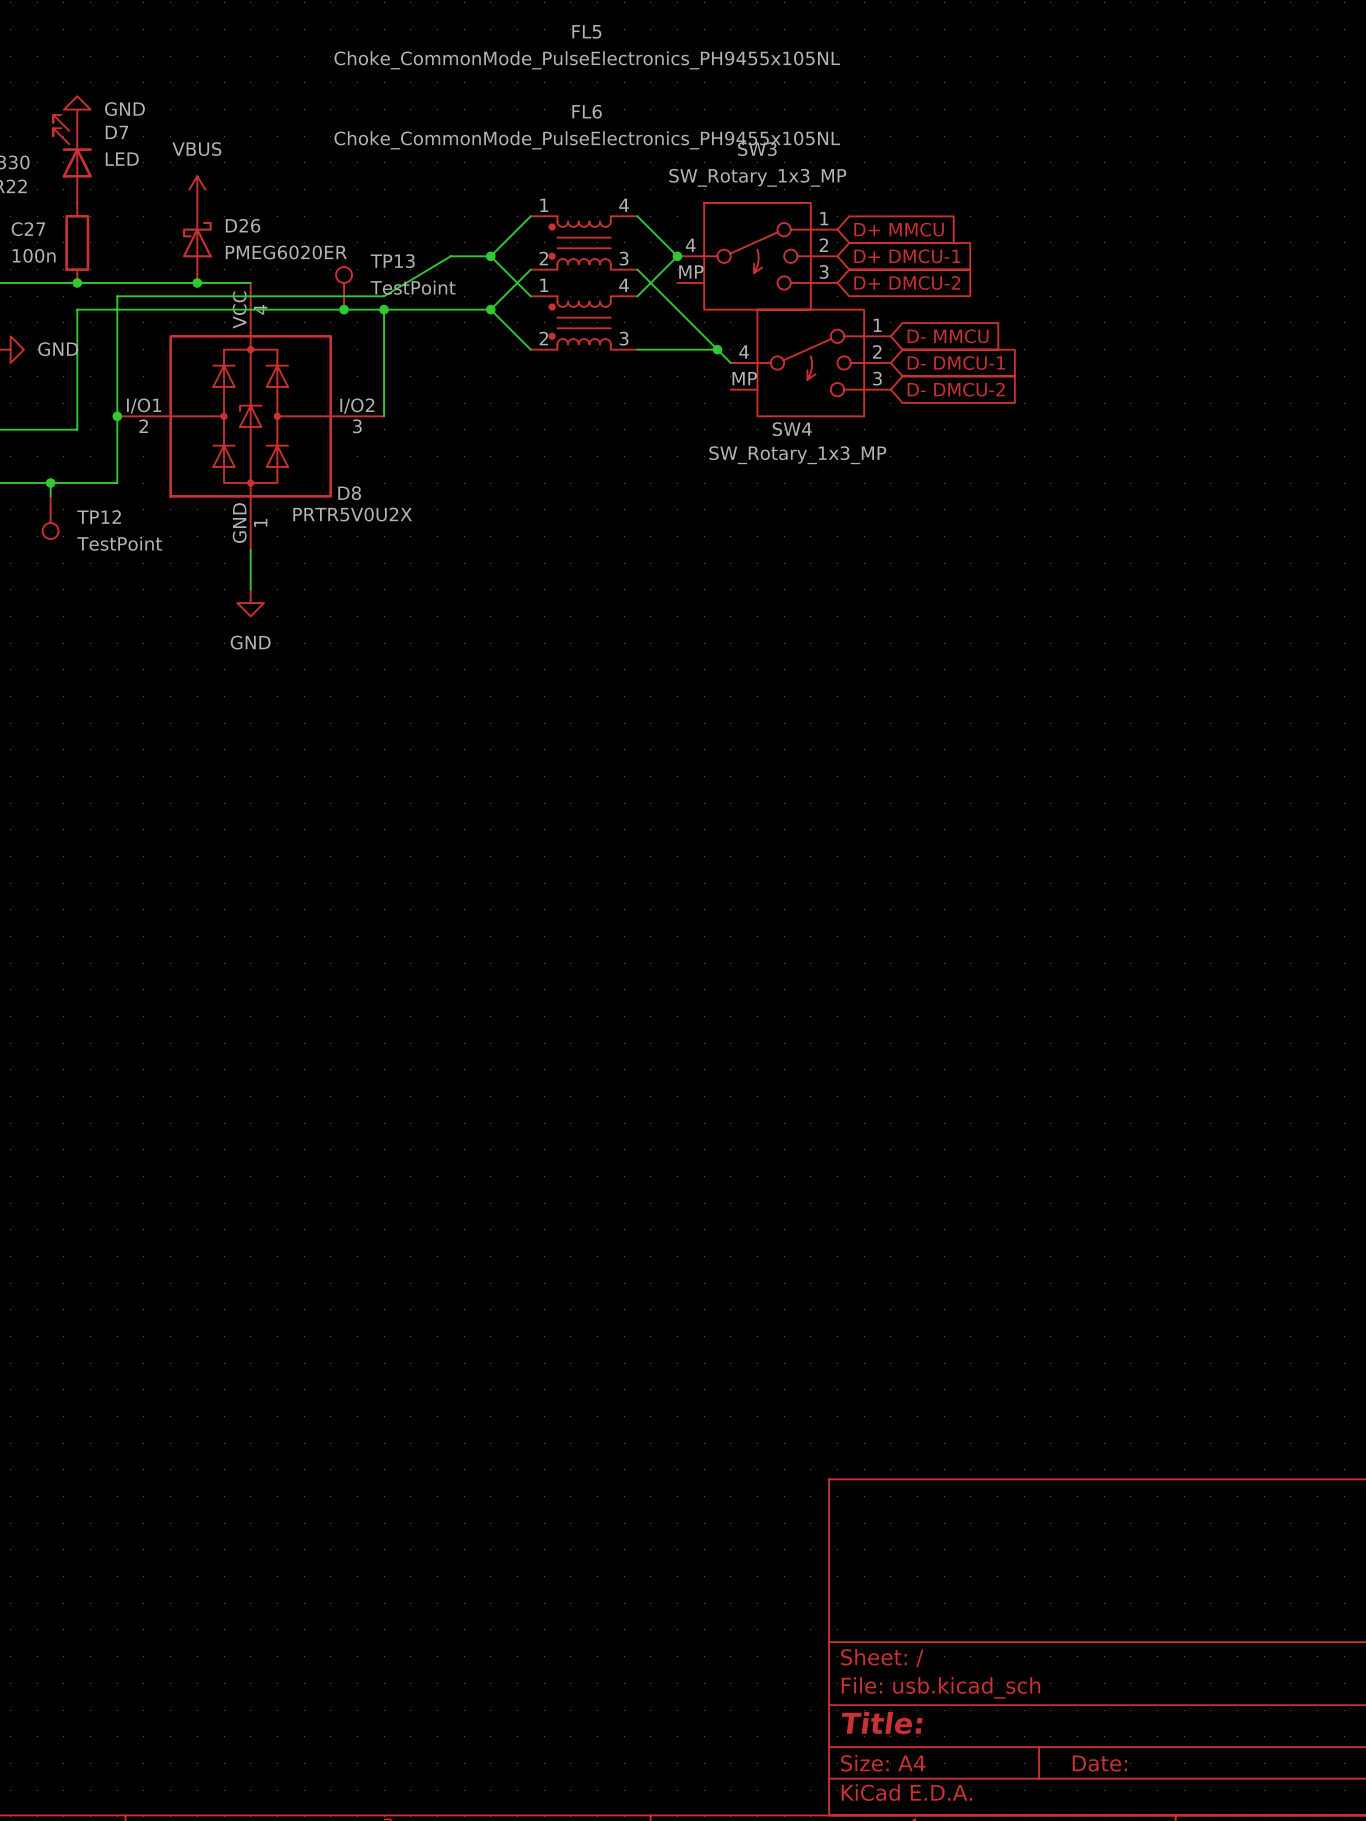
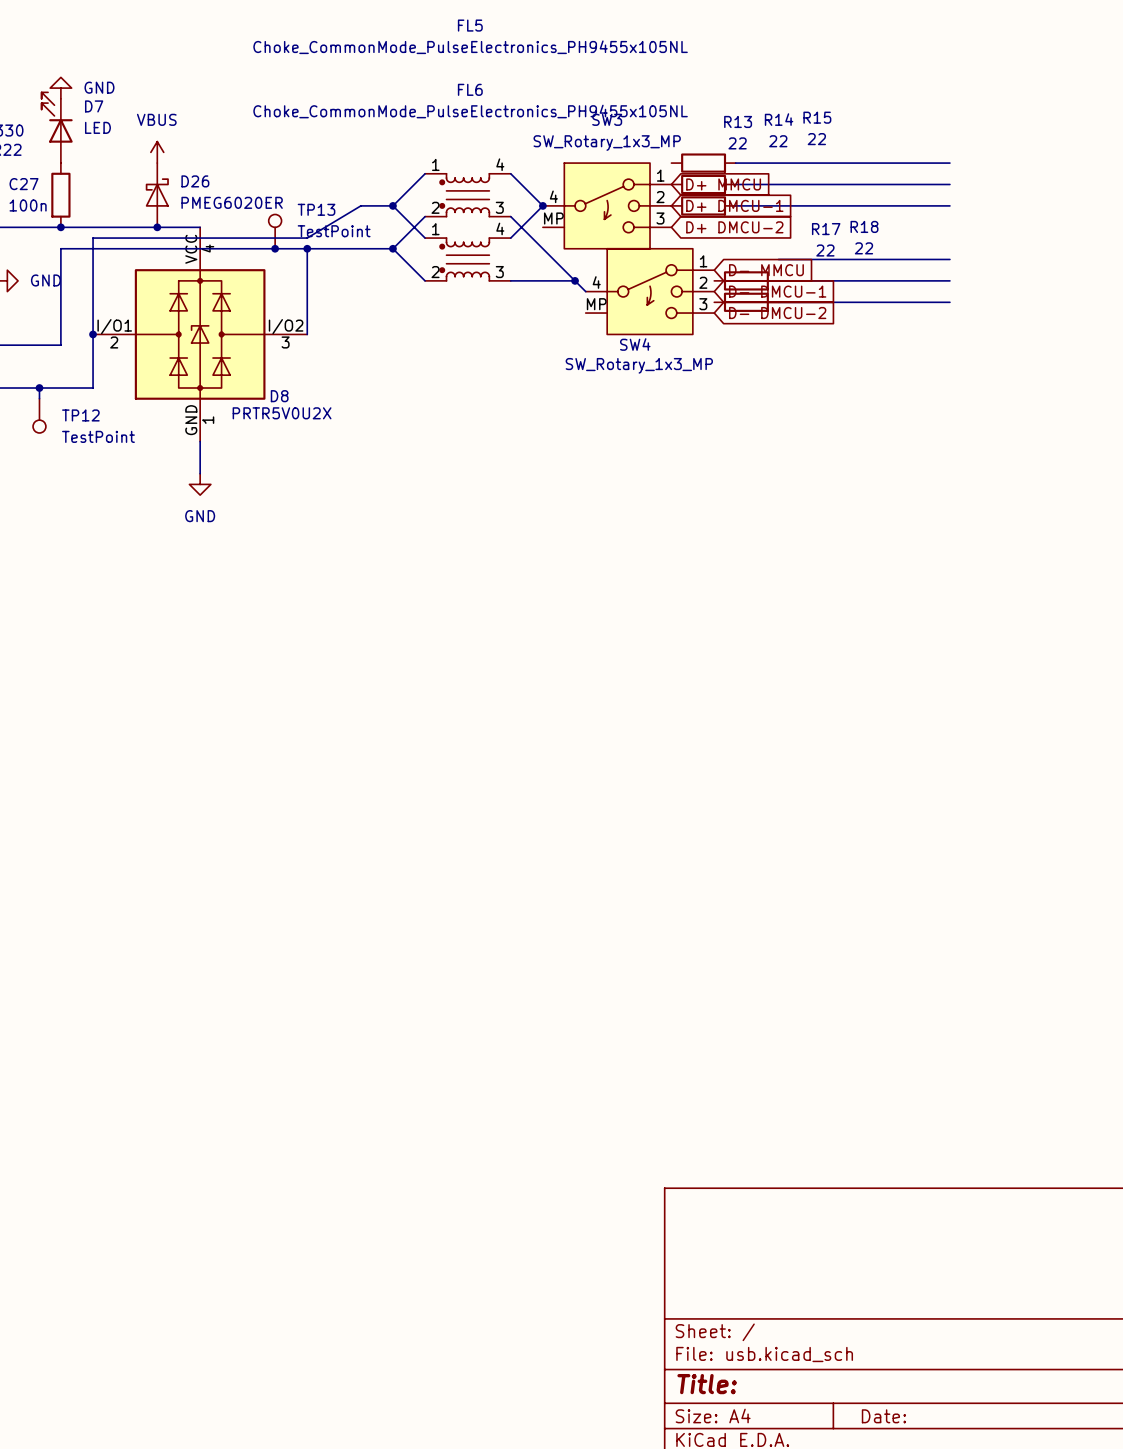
R13: none -> 22 (703, 163)
wire: none -> (735, 163) (949, 163)
R14: none -> 22 (703, 184)
wire: none -> (735, 184) (949, 184)
R15: none -> 22 (703, 205)
wire: none -> (735, 205) (949, 205)
wire: none -> (778, 259) (949, 259)
R17: none -> 22 (746, 280)
wire: none -> (778, 280) (949, 280)
R18: none -> 22 (746, 302)
wire: none -> (778, 302) (949, 302)

